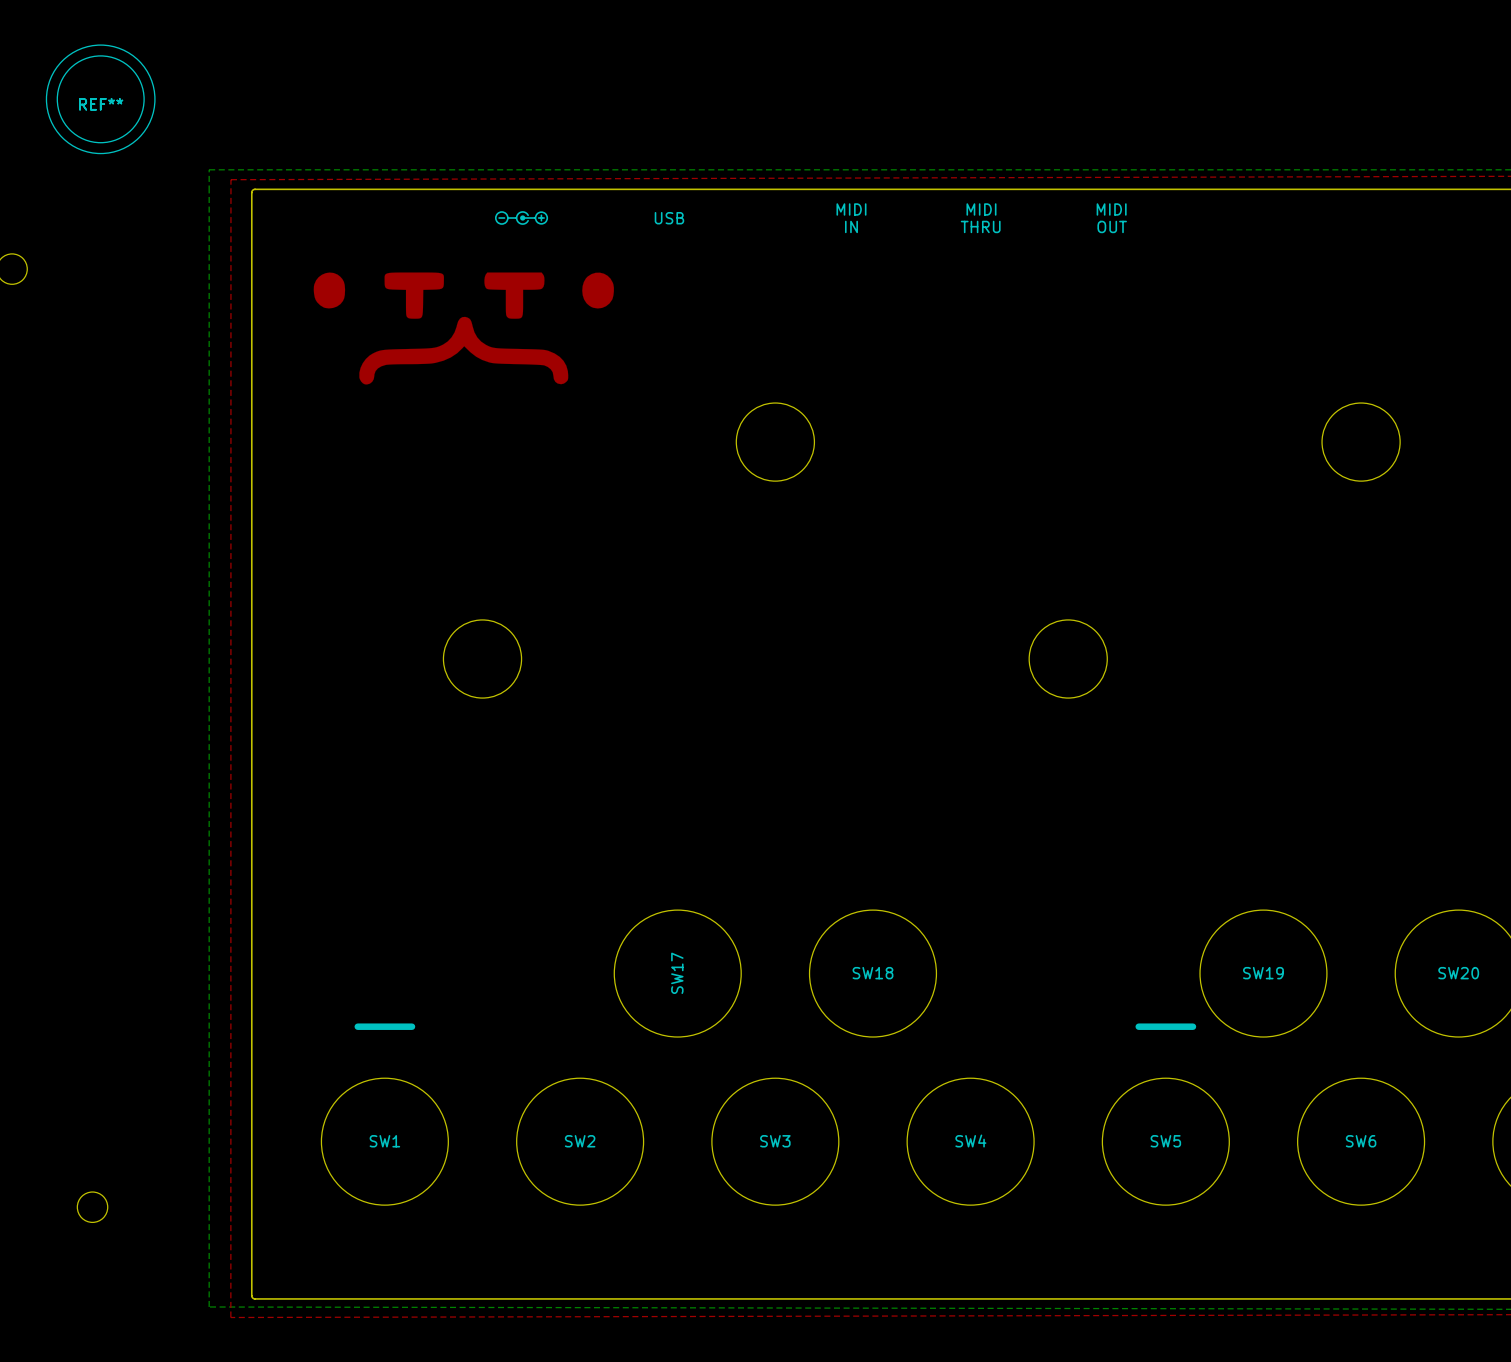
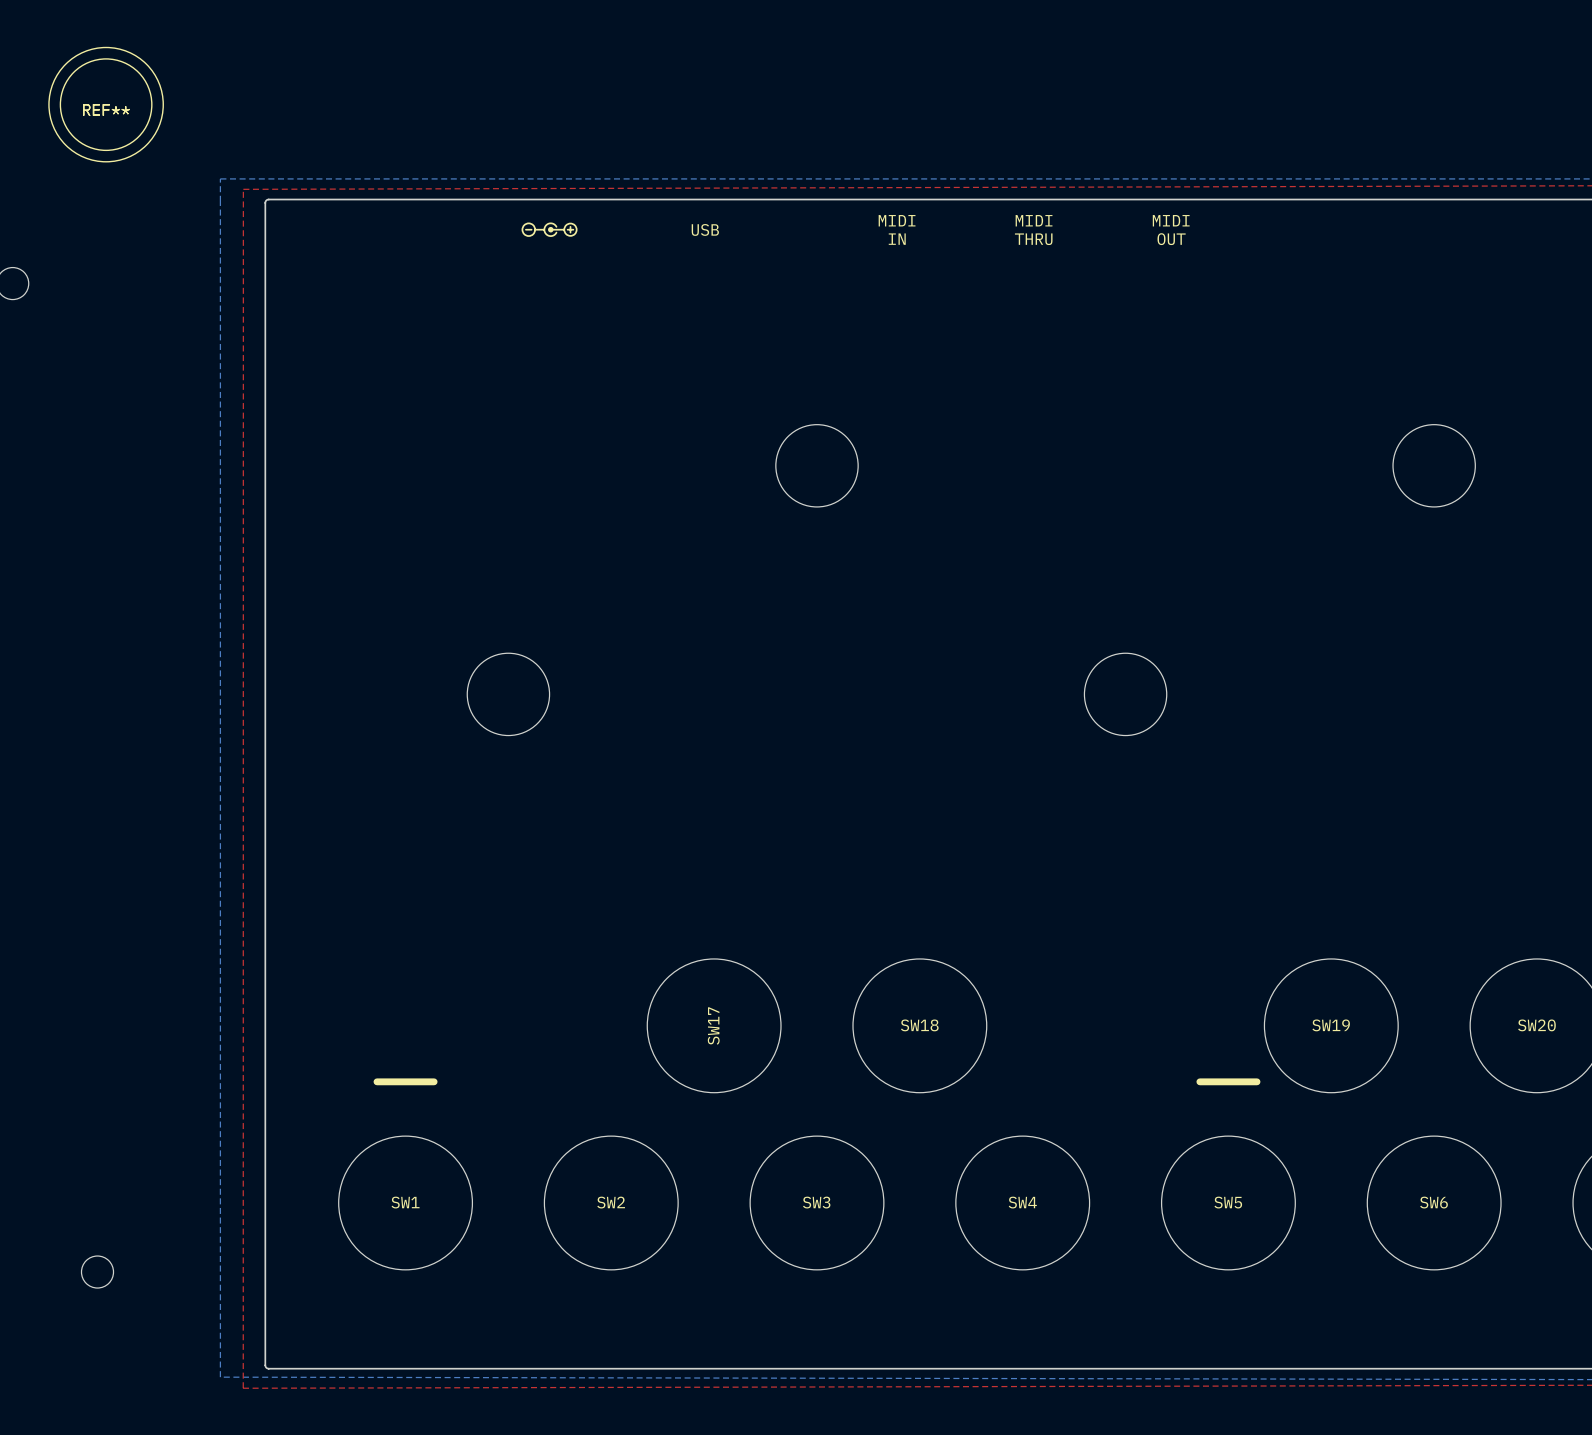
drawing: [313, 272, 614, 385] -> none

